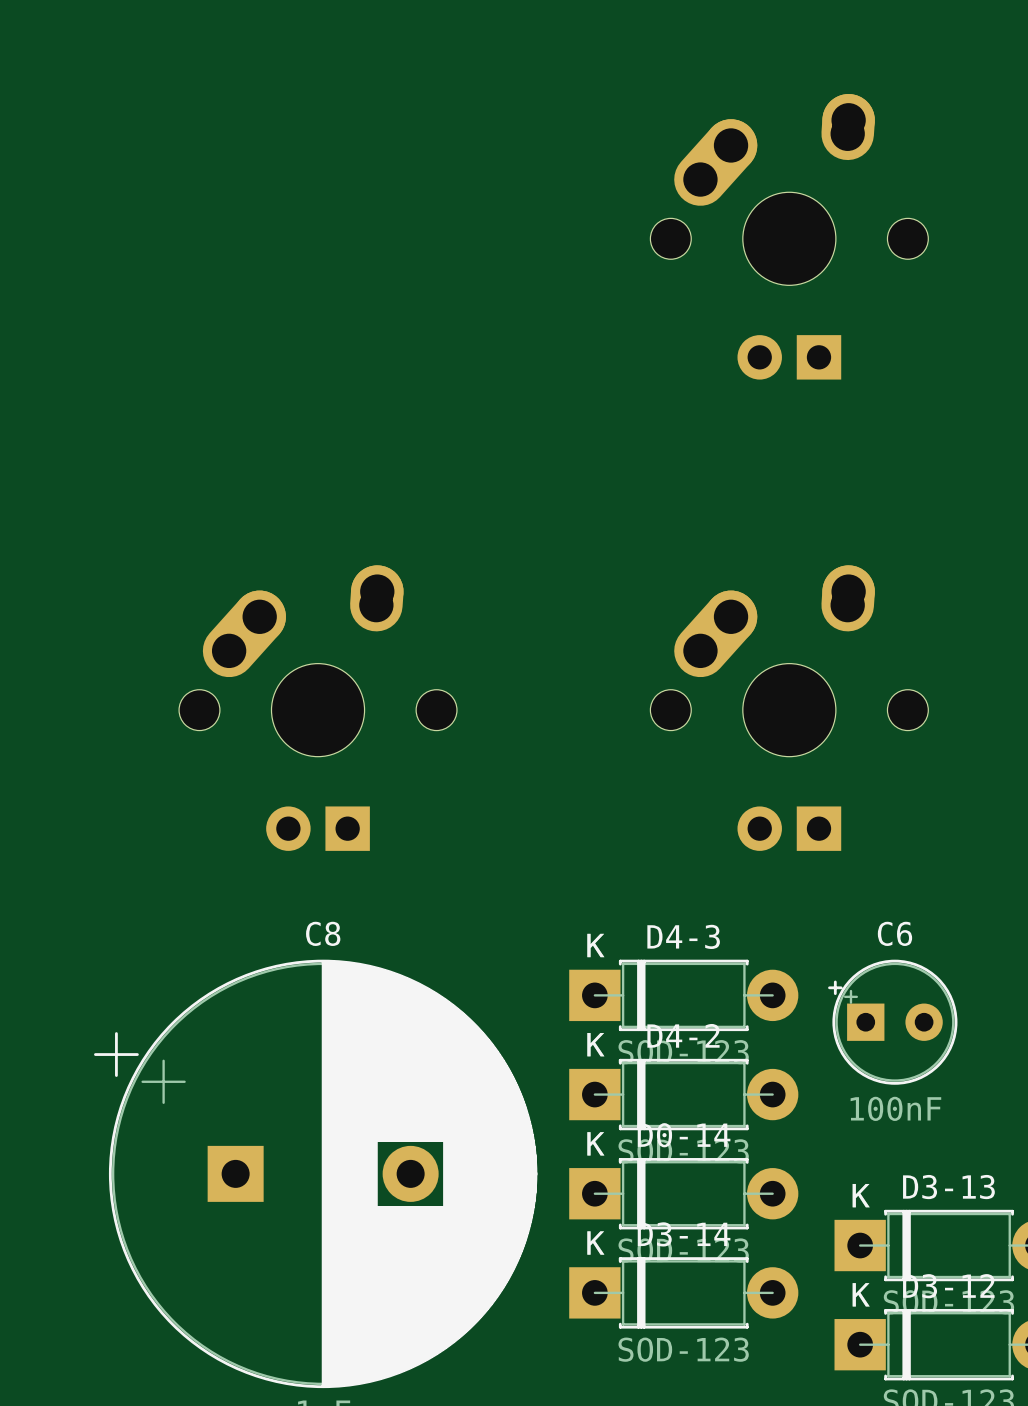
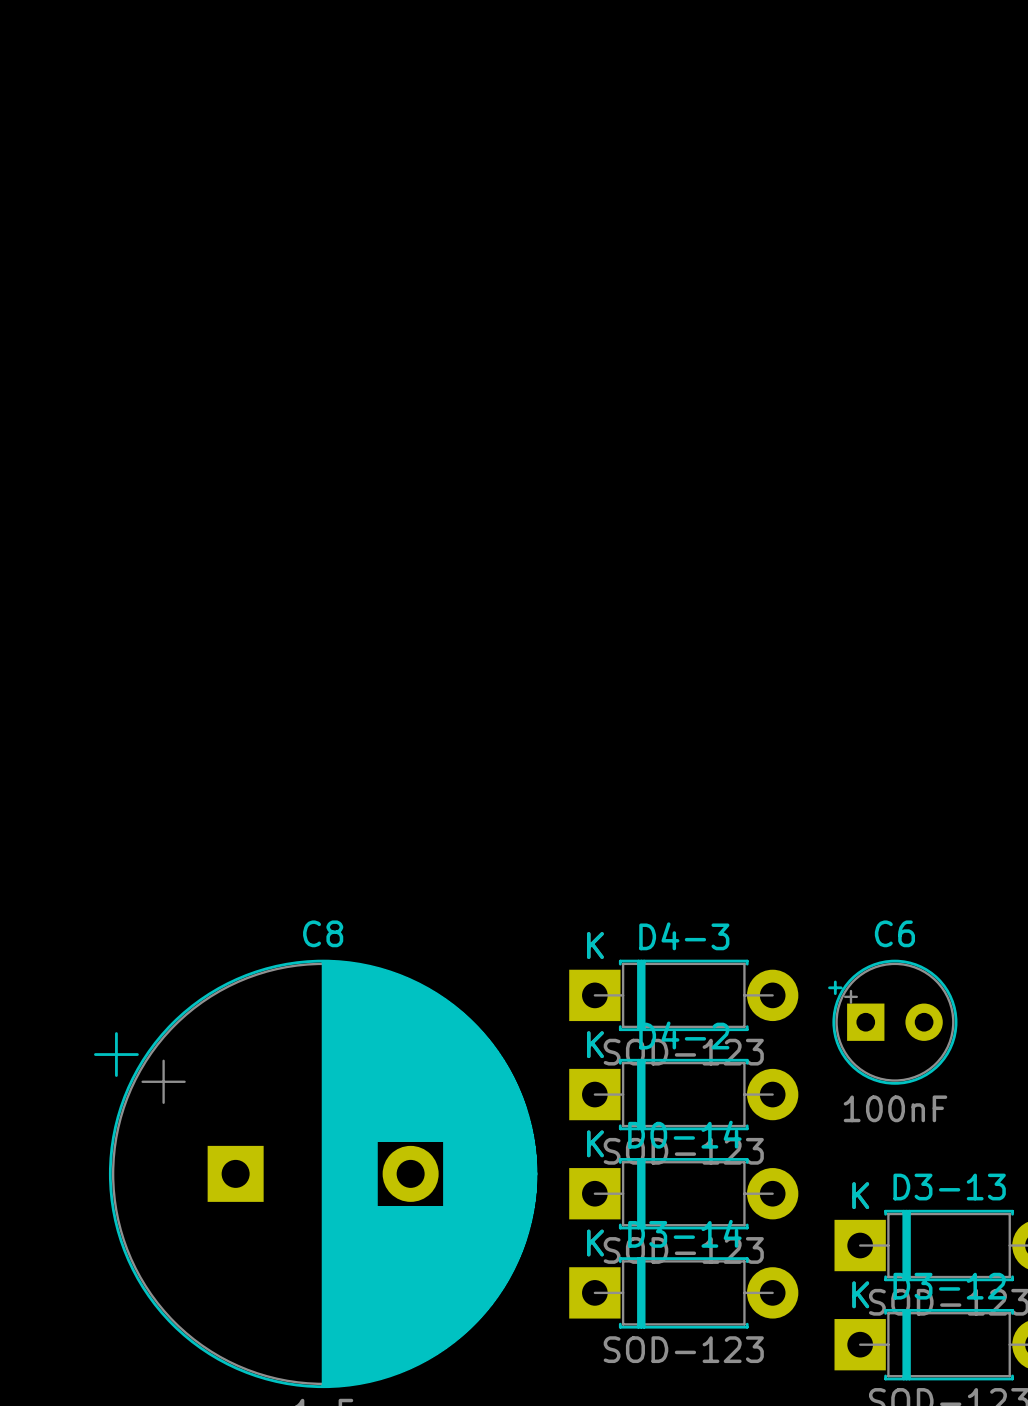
part: (789, 236) -> none
part: (318, 708) -> none
part: (789, 708) -> none

